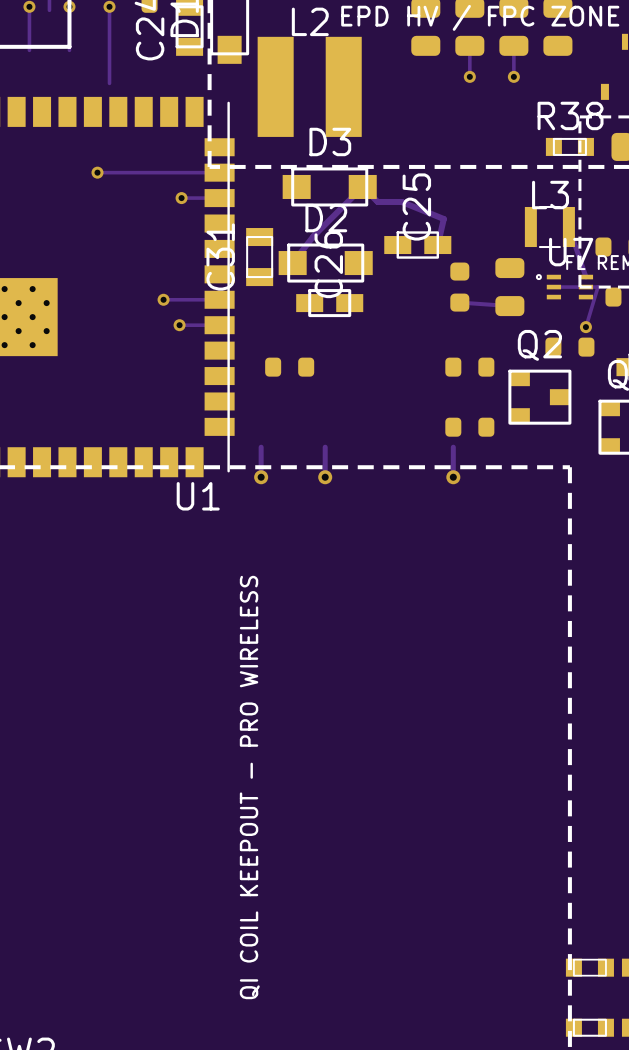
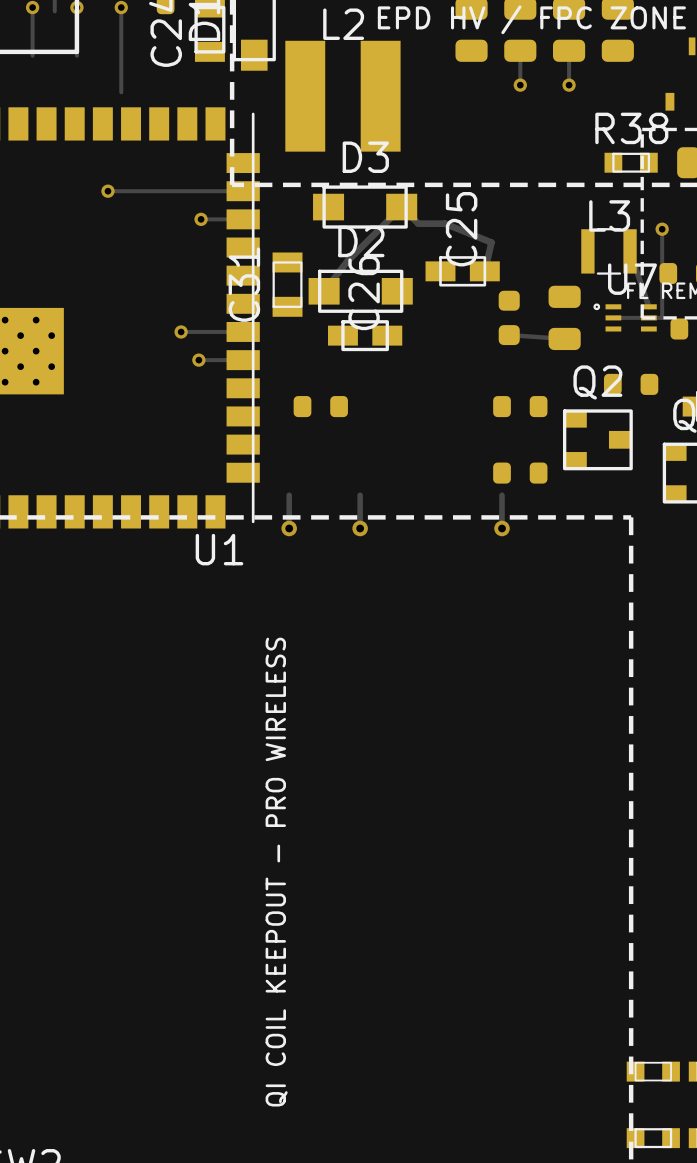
via: none -> (662, 229)
track: (597, 287) (585, 327) -> (662, 317) (662, 229)
via: (585, 327) -> none

